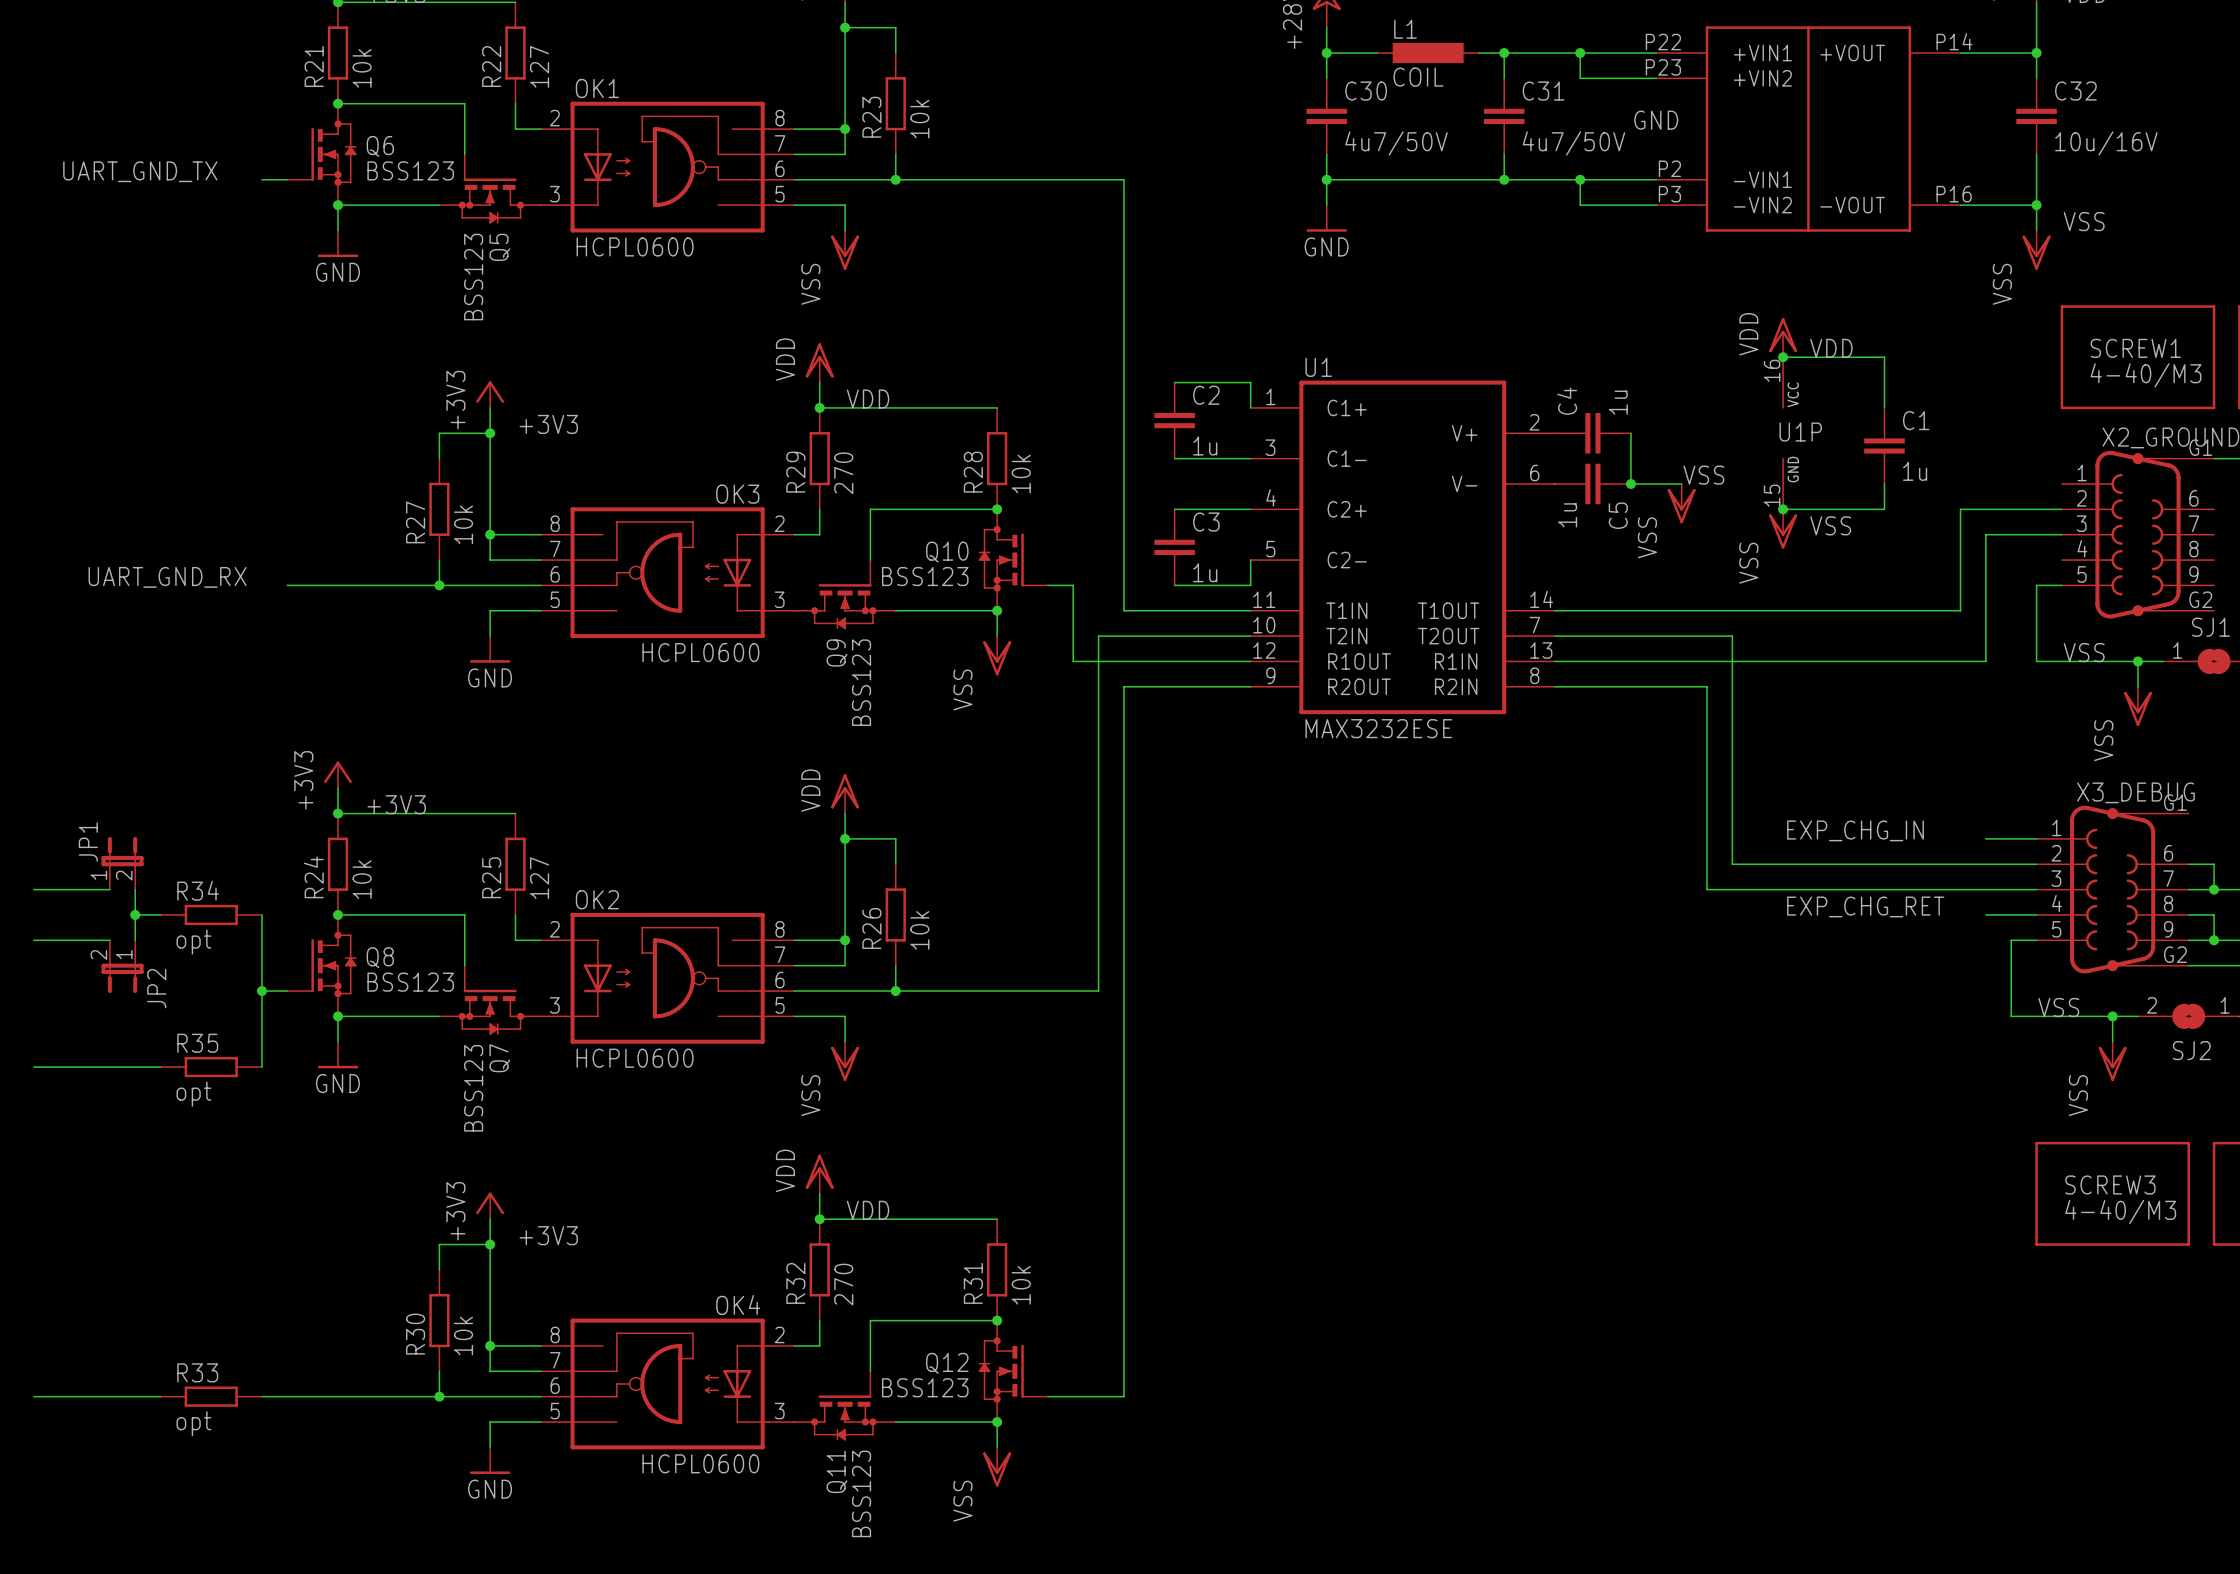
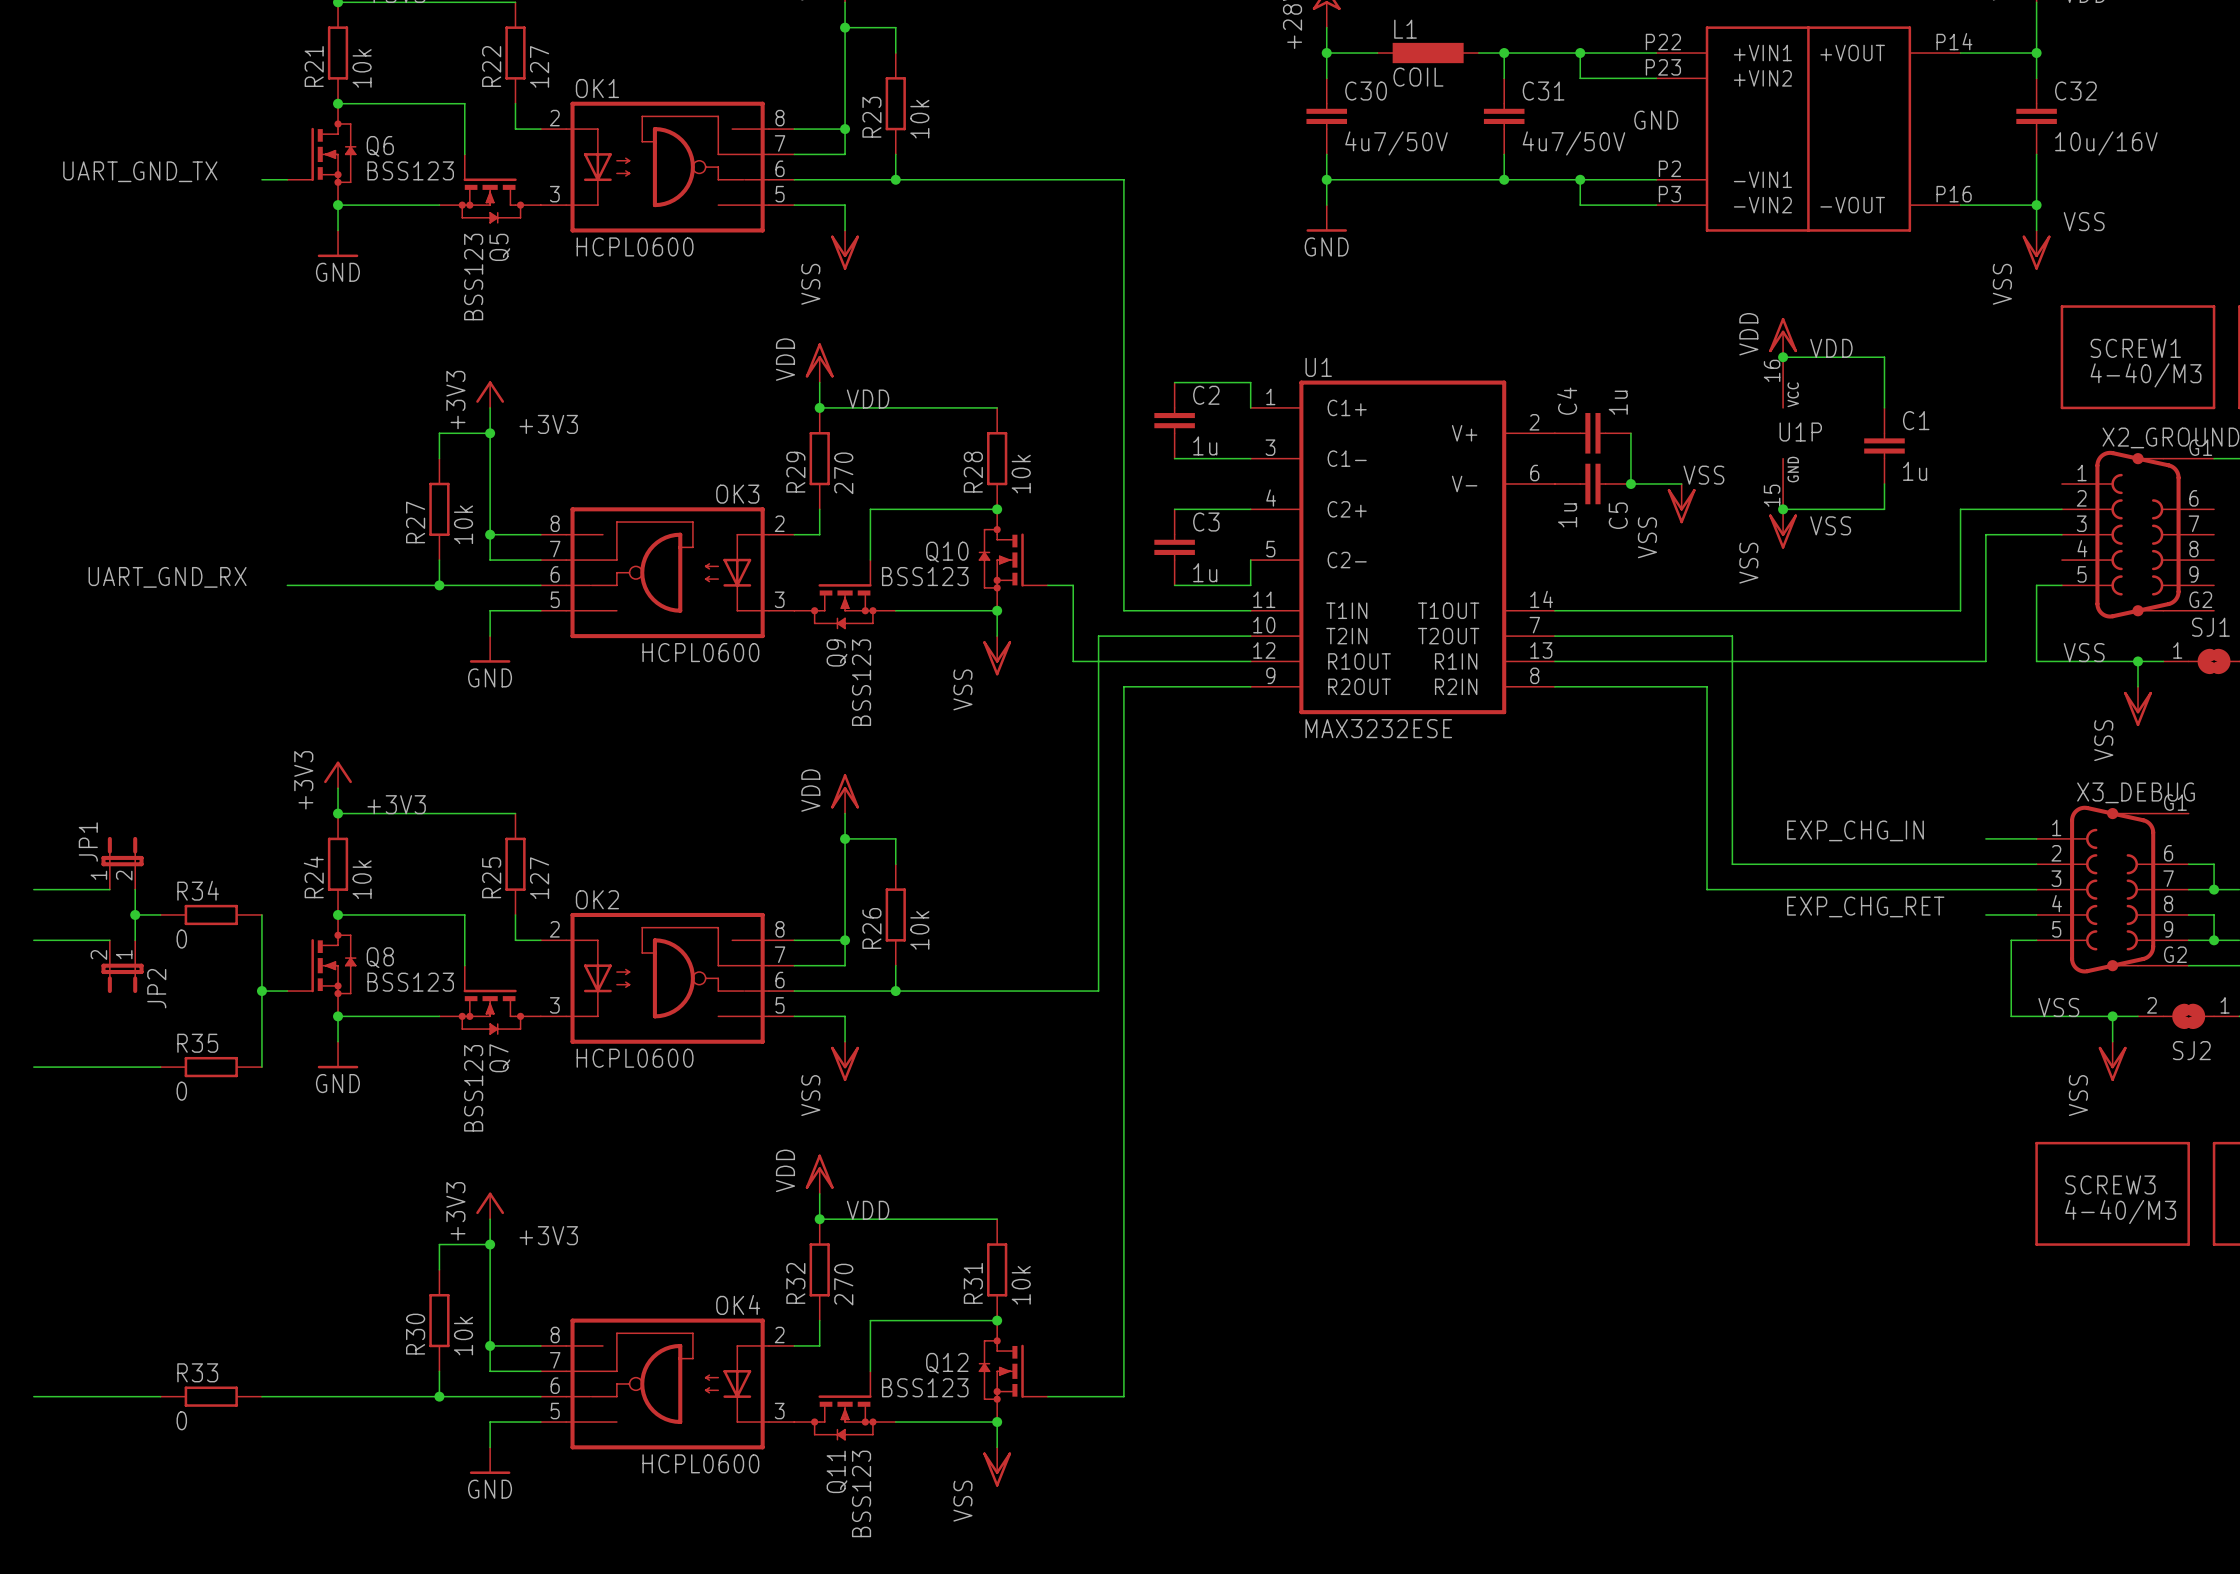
R34 value: opt (193, 942) -> 0 (181, 939)
R35 value: opt (193, 1094) -> 0 (181, 1091)
R33 value: opt (193, 1423) -> 0 (181, 1420)

